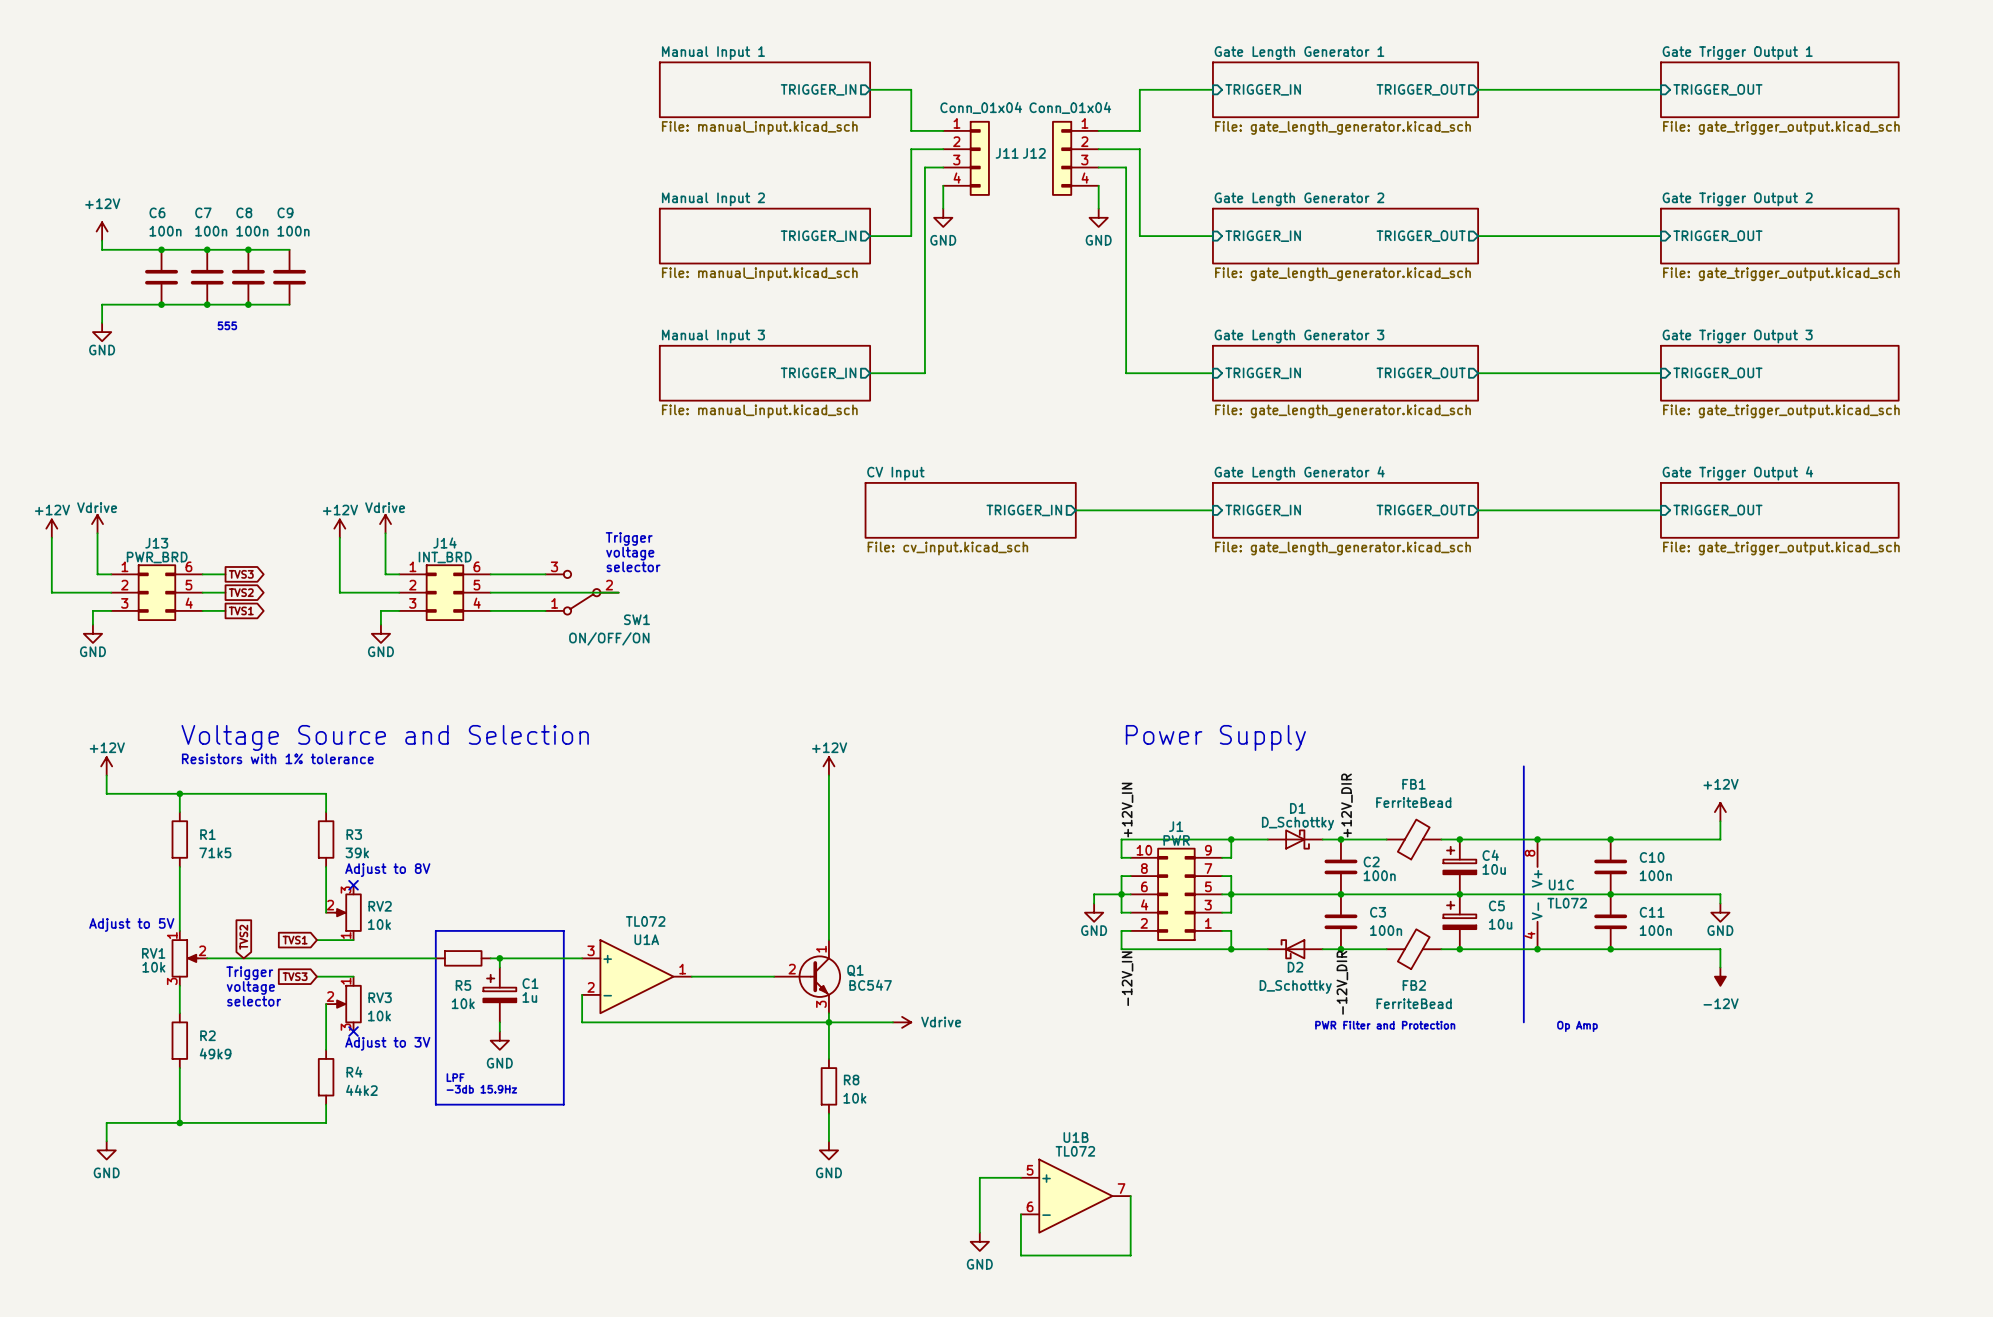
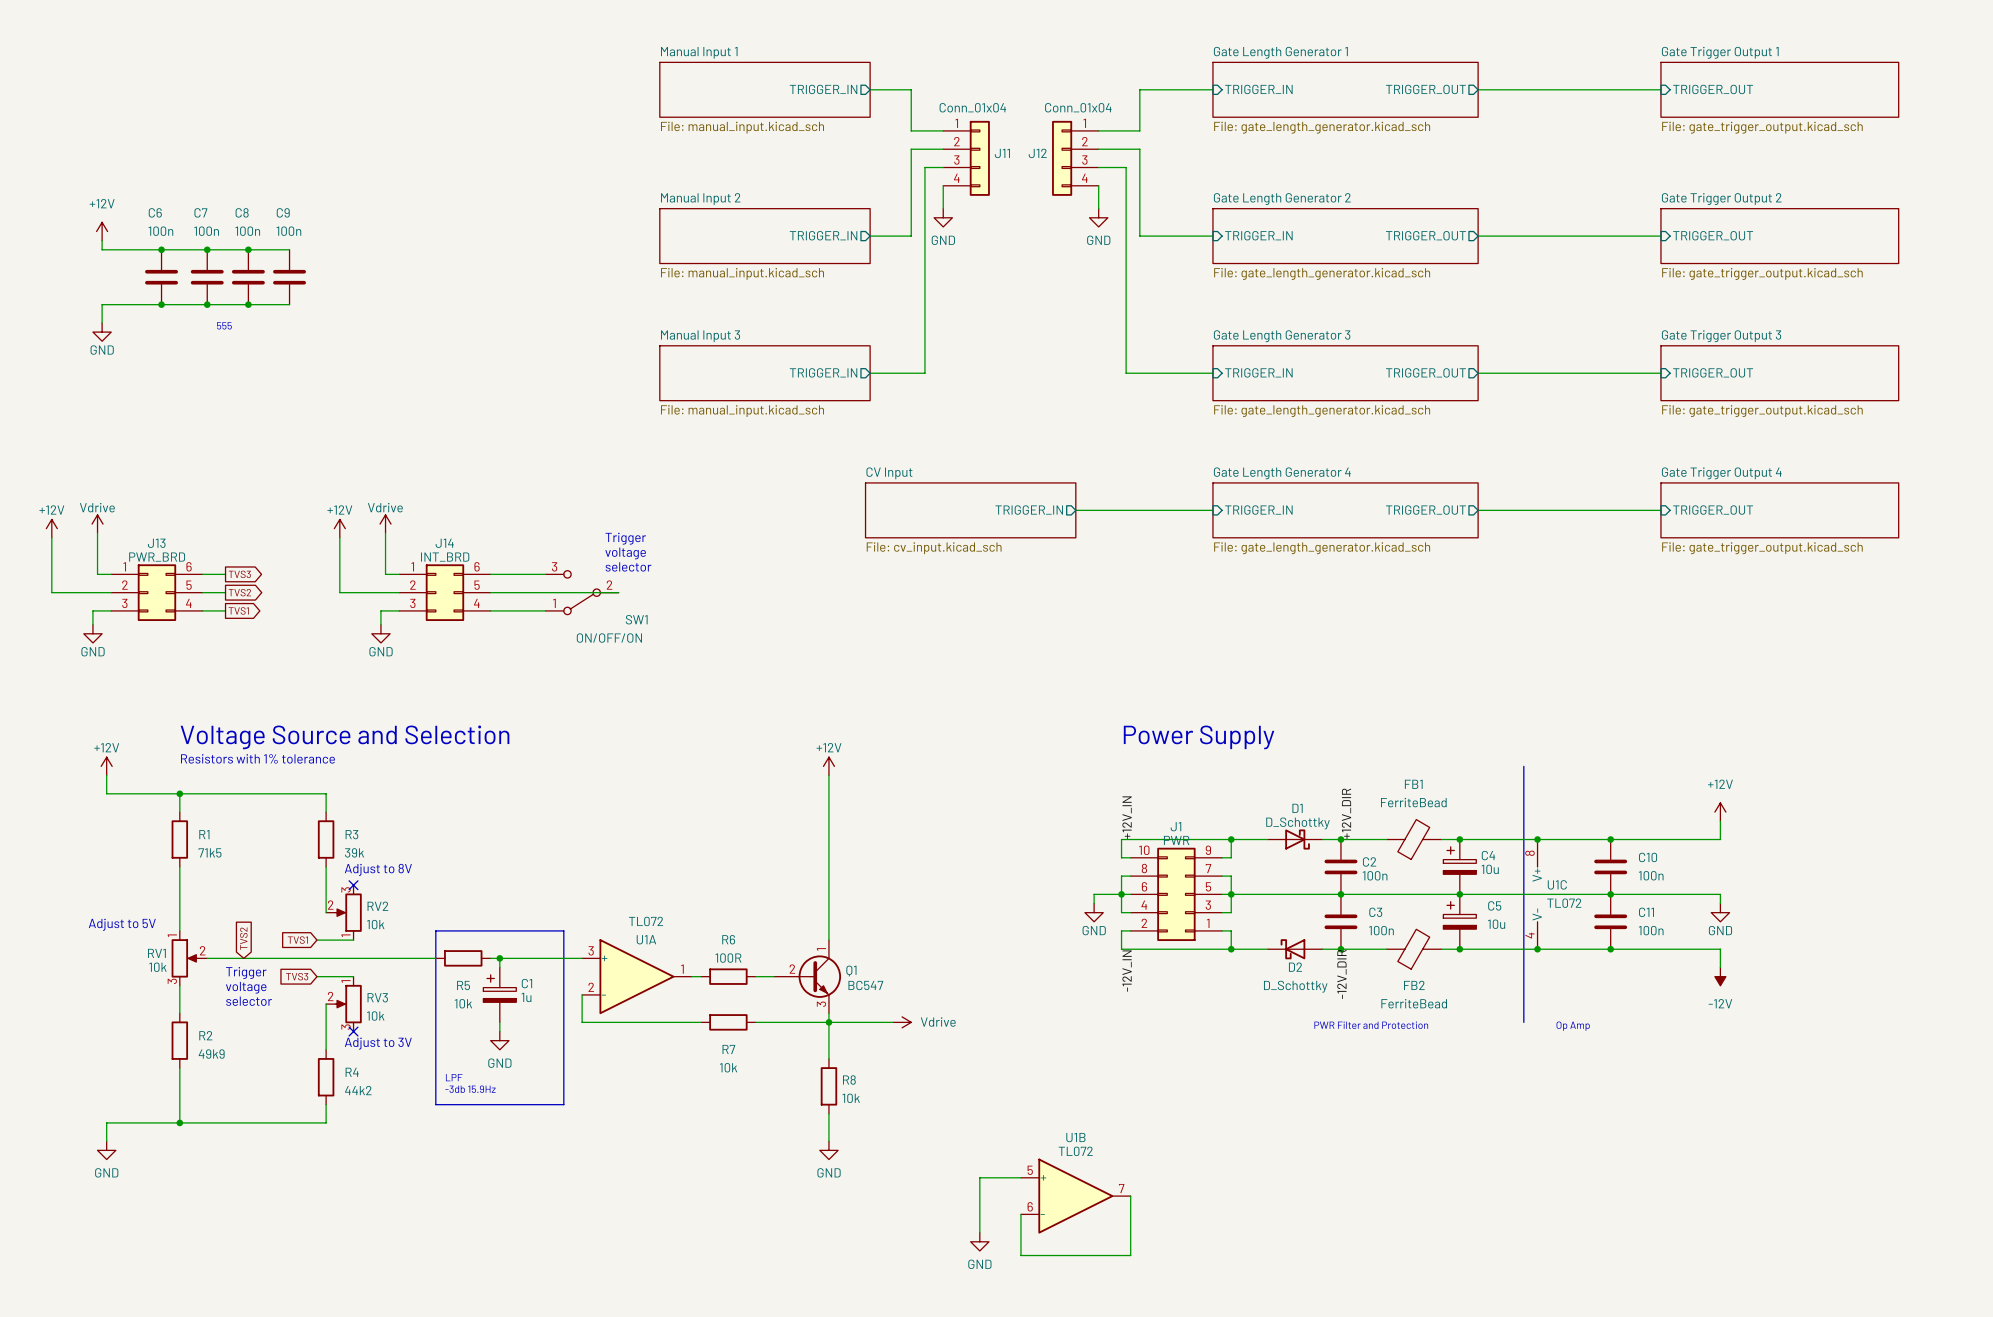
wire: (700, 976) (755, 976) -> none
R6: none -> 100R (728, 976)
wire: (700, 1022) (755, 1022) -> none
R7: none -> 10k (728, 1022)

